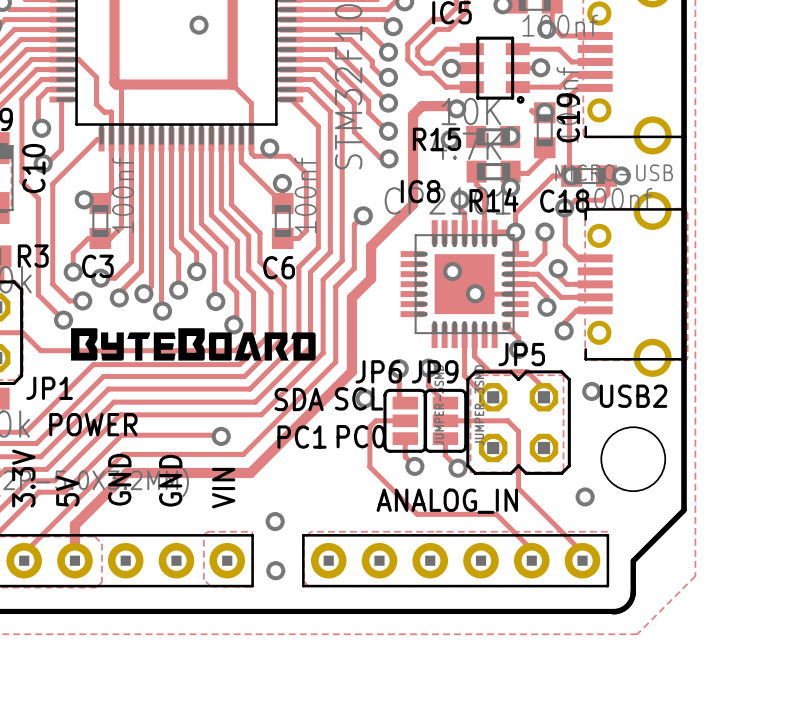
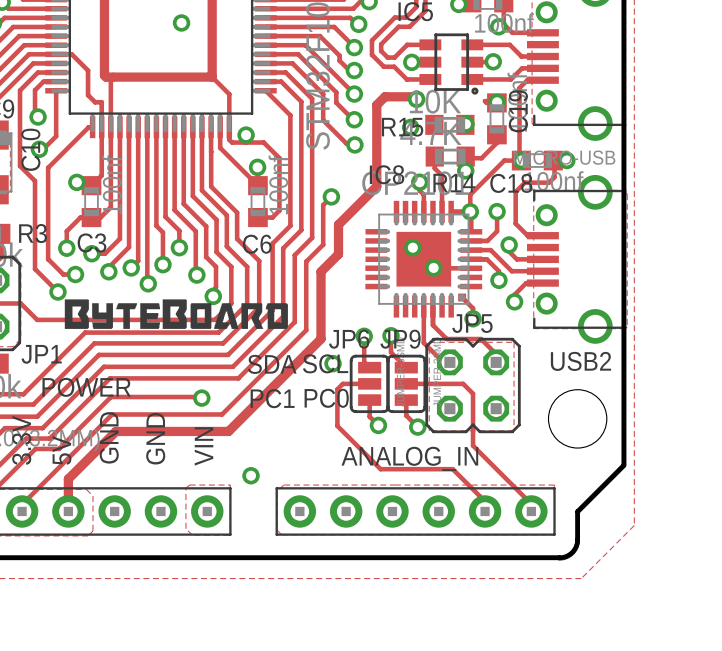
via: (564, 208) -> none
via: (591, 391) -> none
via: (585, 496) -> none
via: (275, 570) -> none

